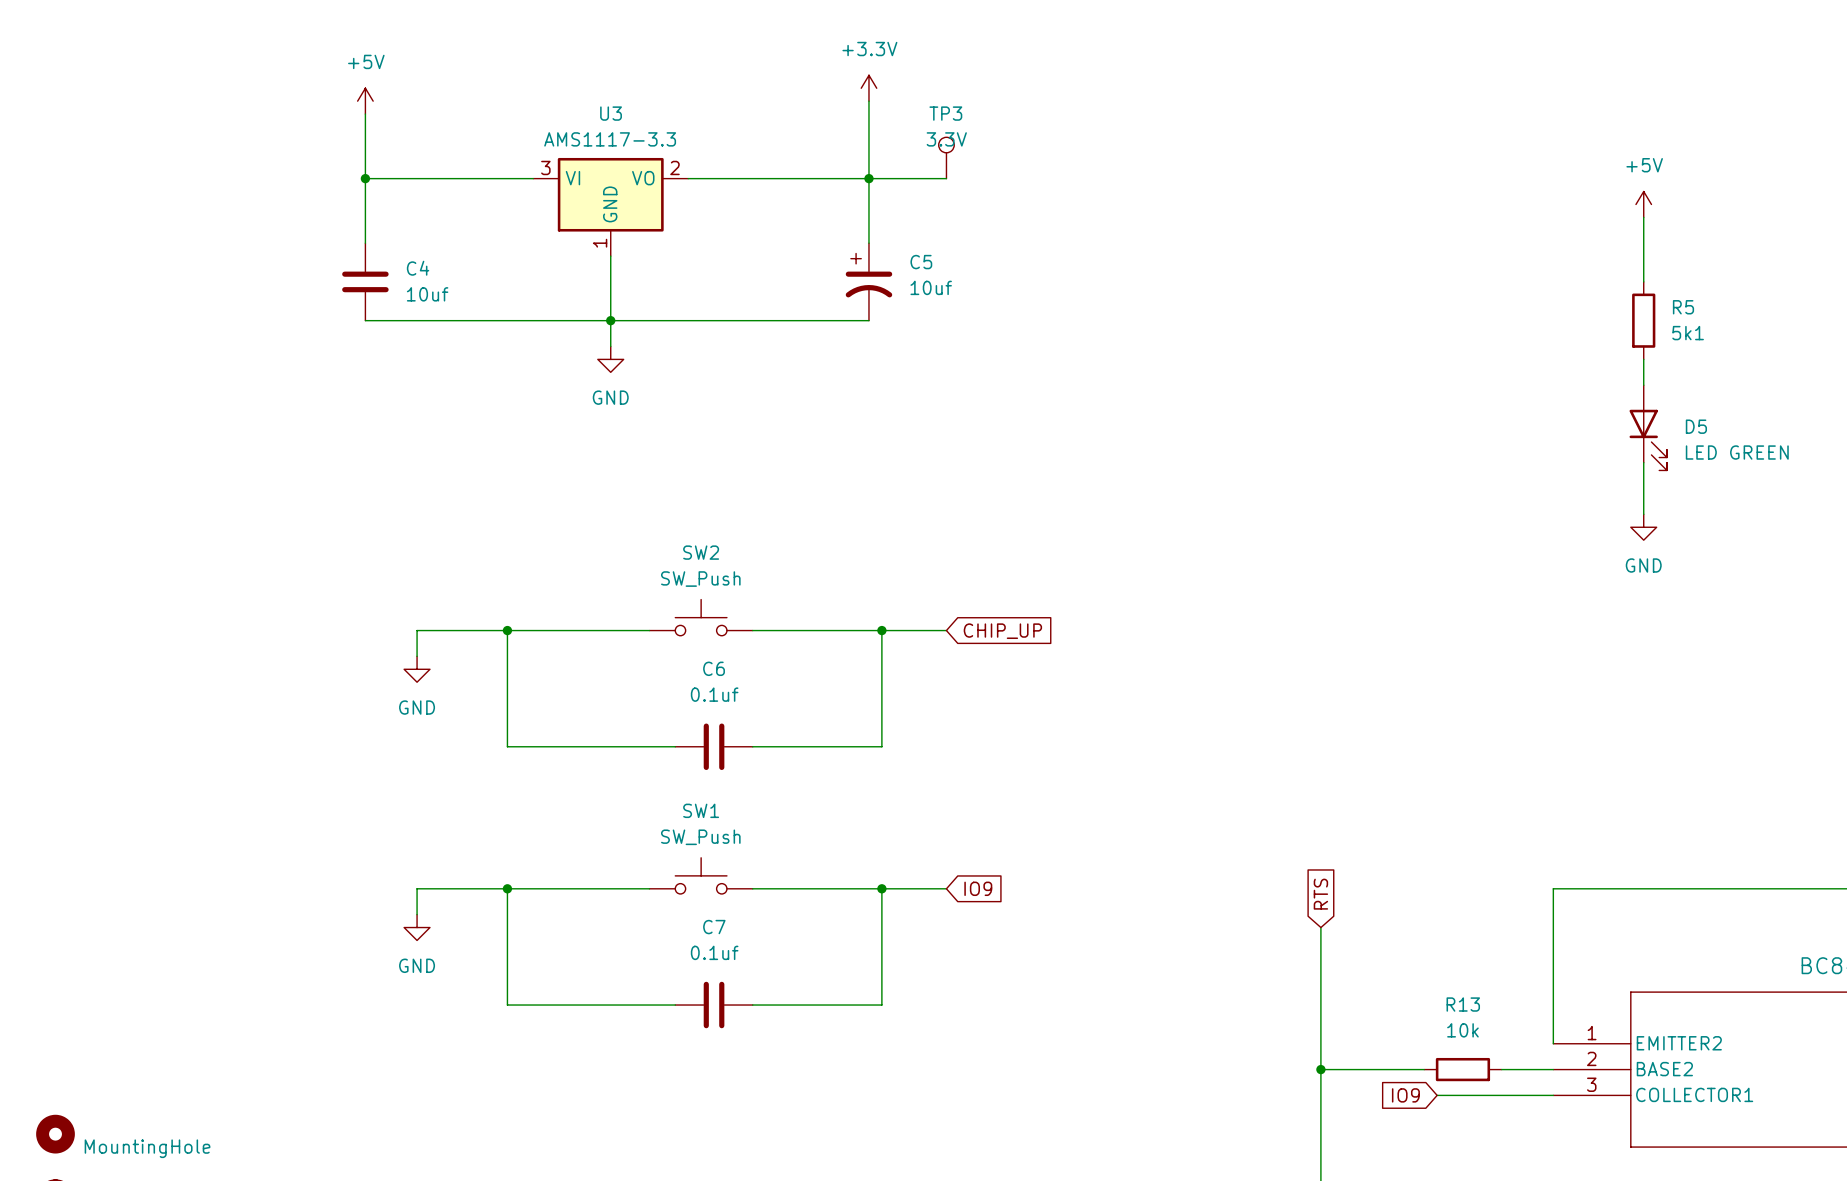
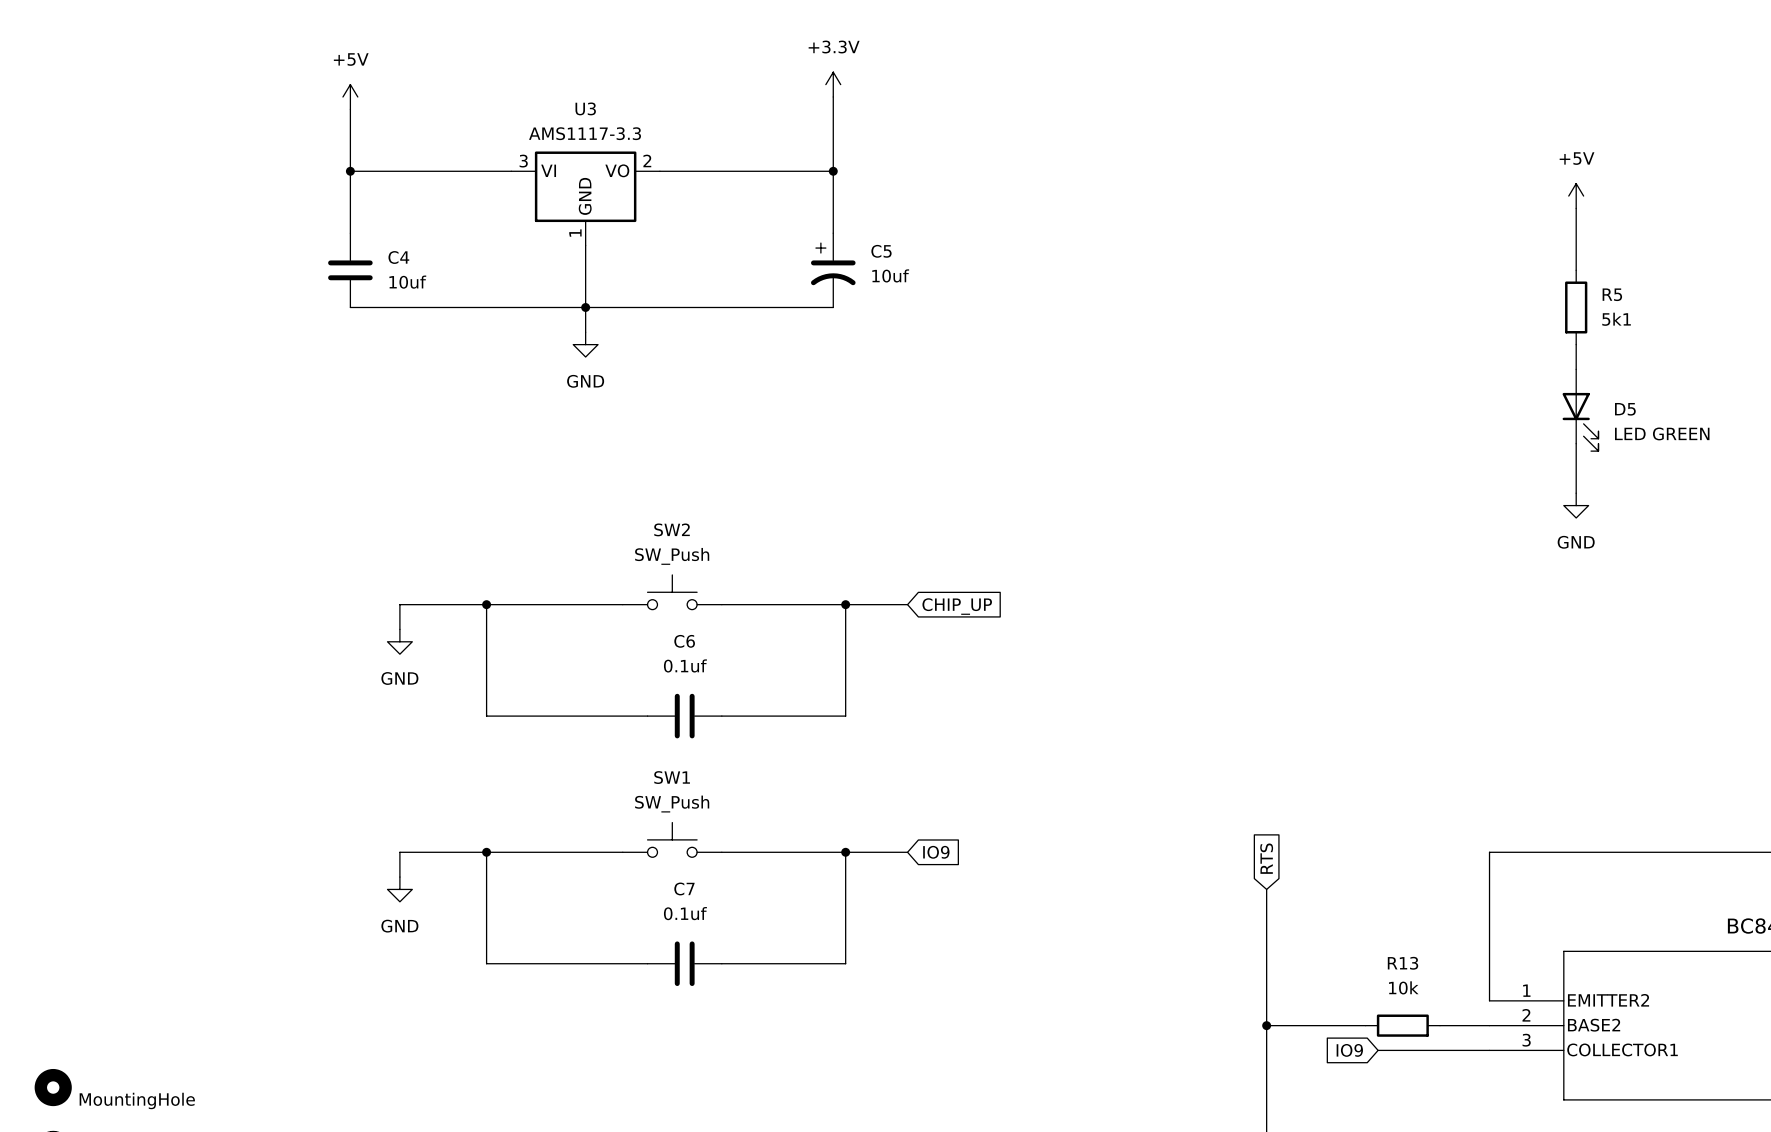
TP3: 3.3V (946, 157) -> none
wire: (868, 178) (946, 178) -> none

